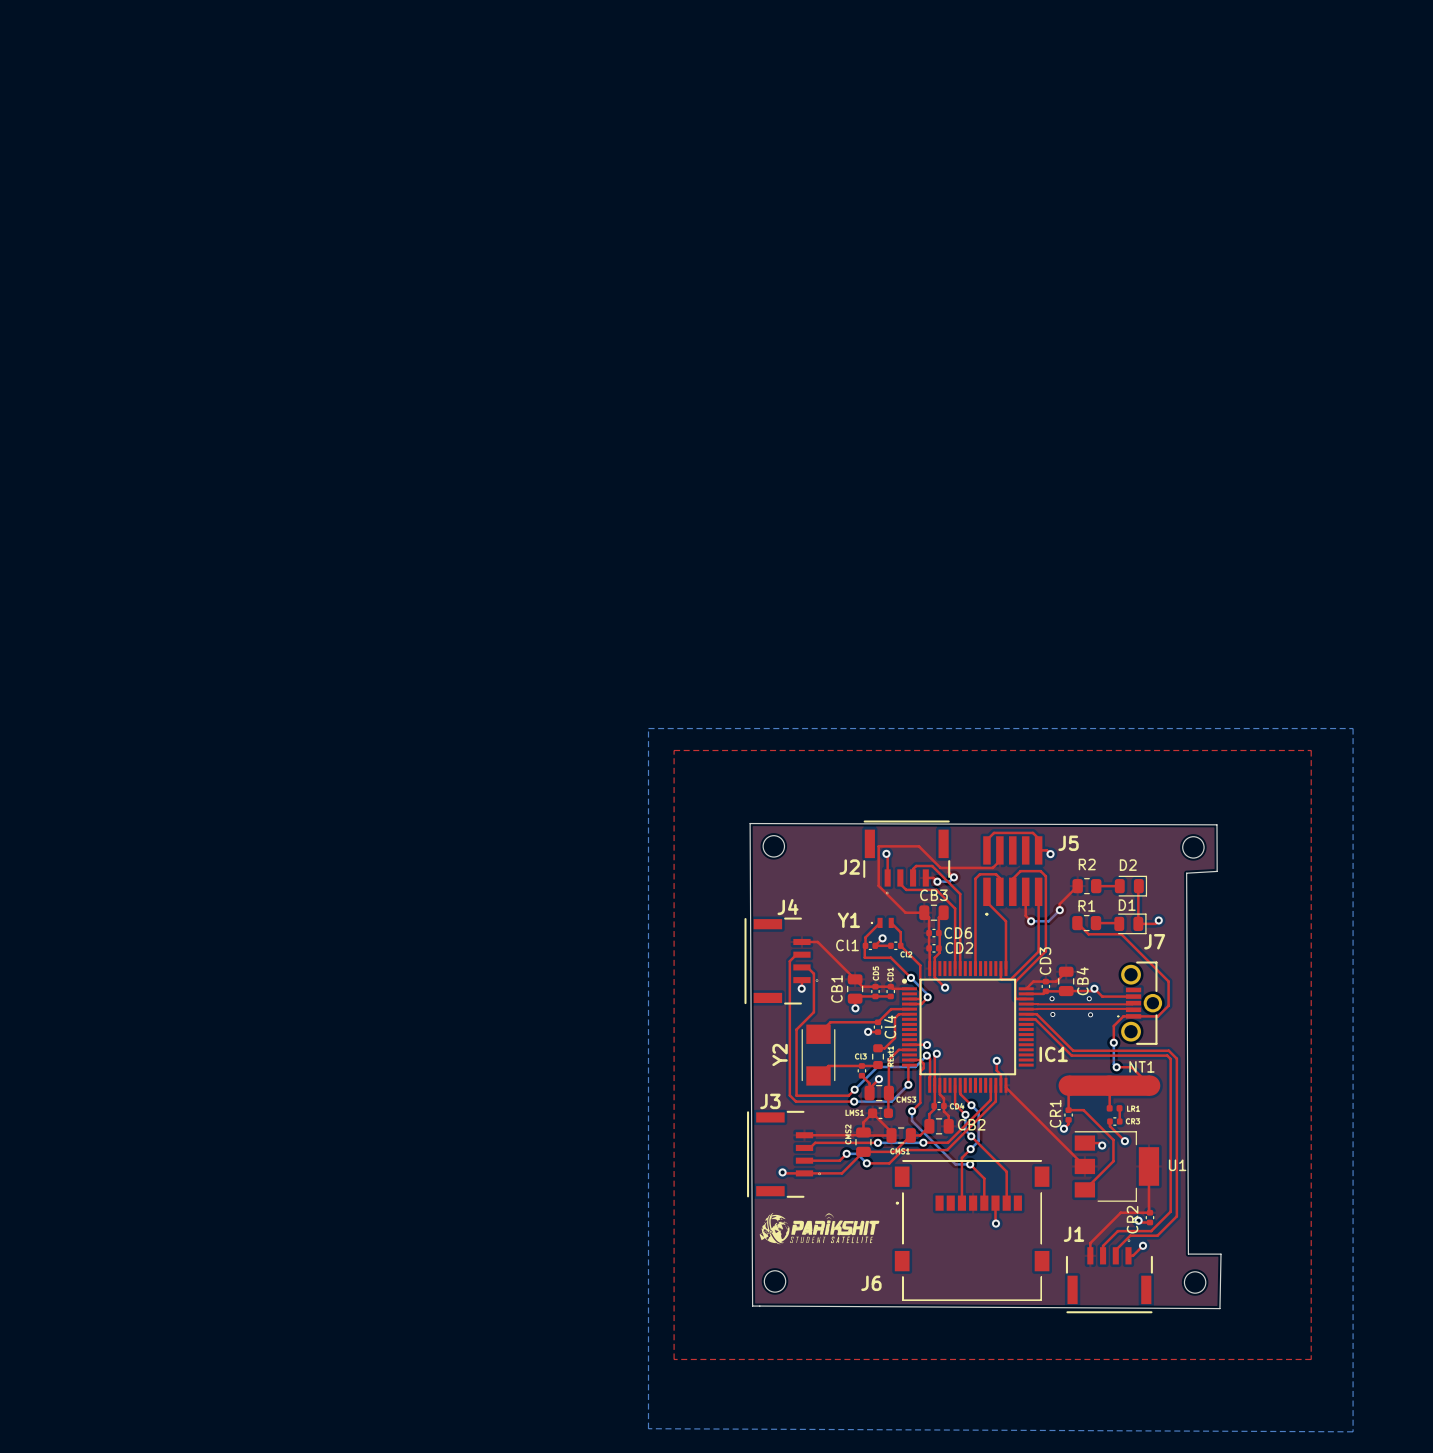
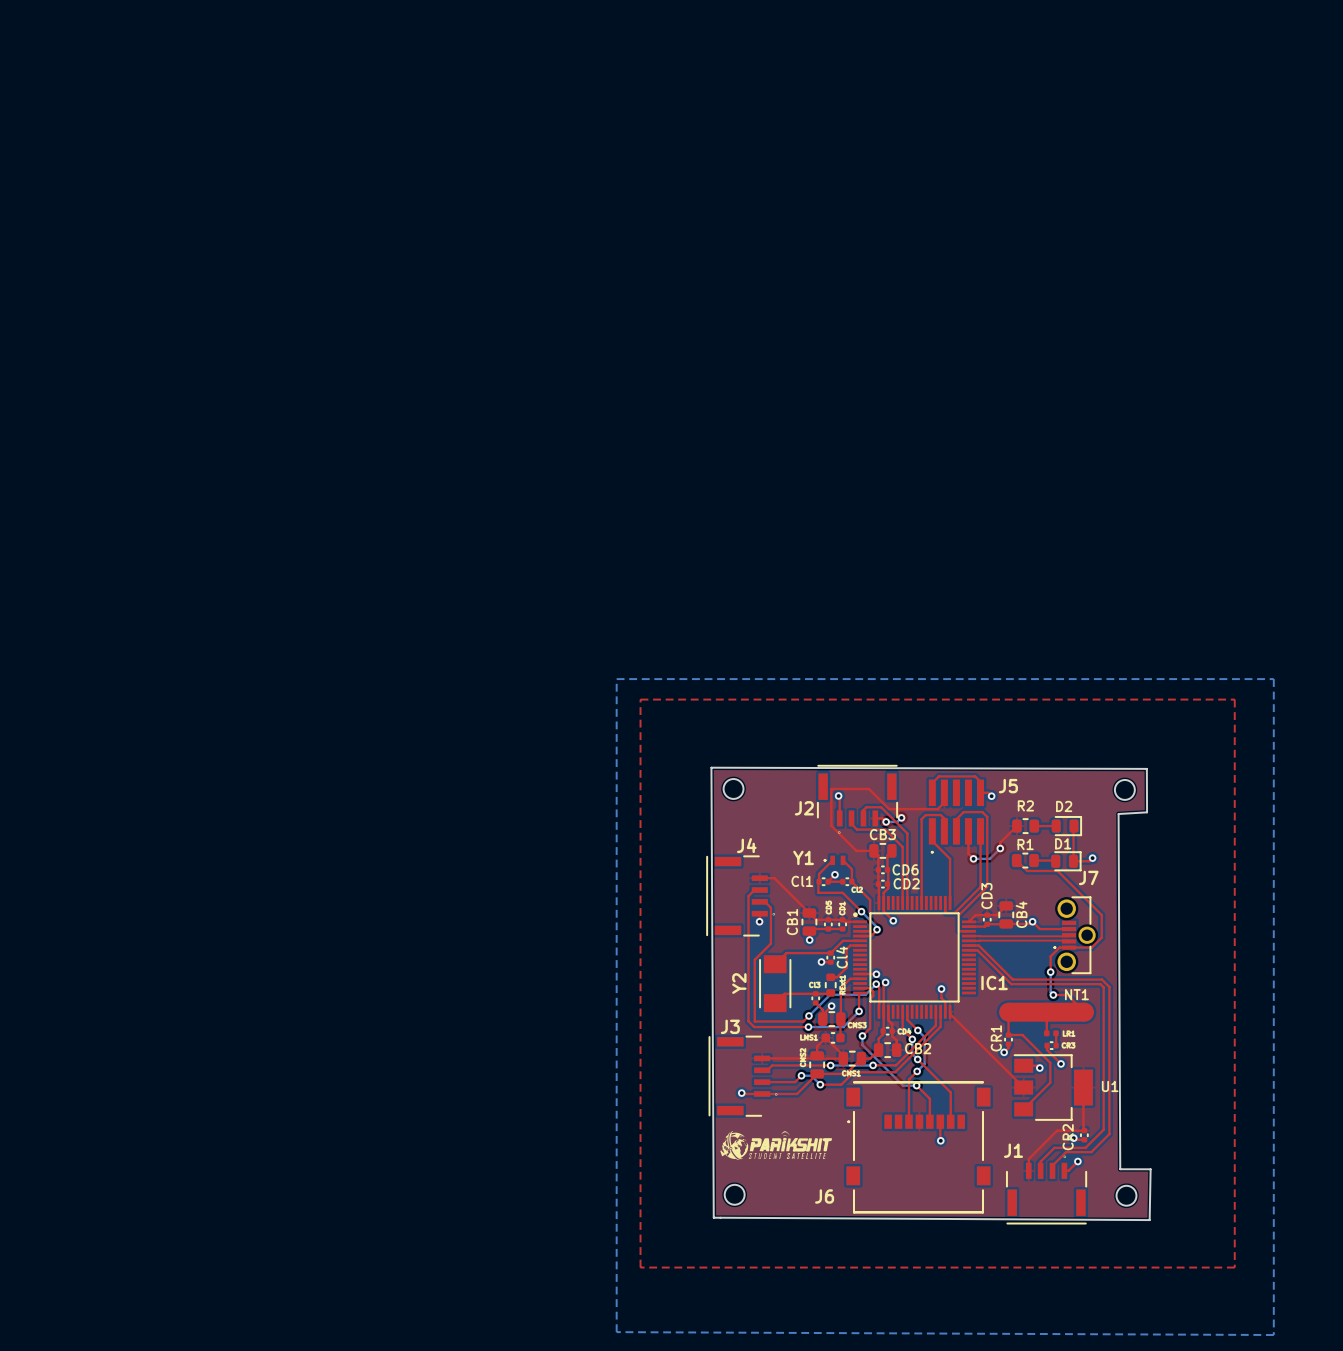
via: (1052, 998) -> none
via: (1089, 998) -> none
via: (1052, 1014) -> none
via: (1090, 1014) -> none

